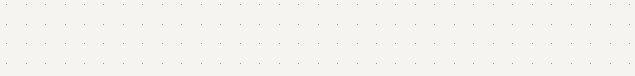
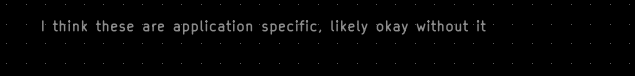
text: none -> I think these are application specific, likely okay without it (263, 27)

